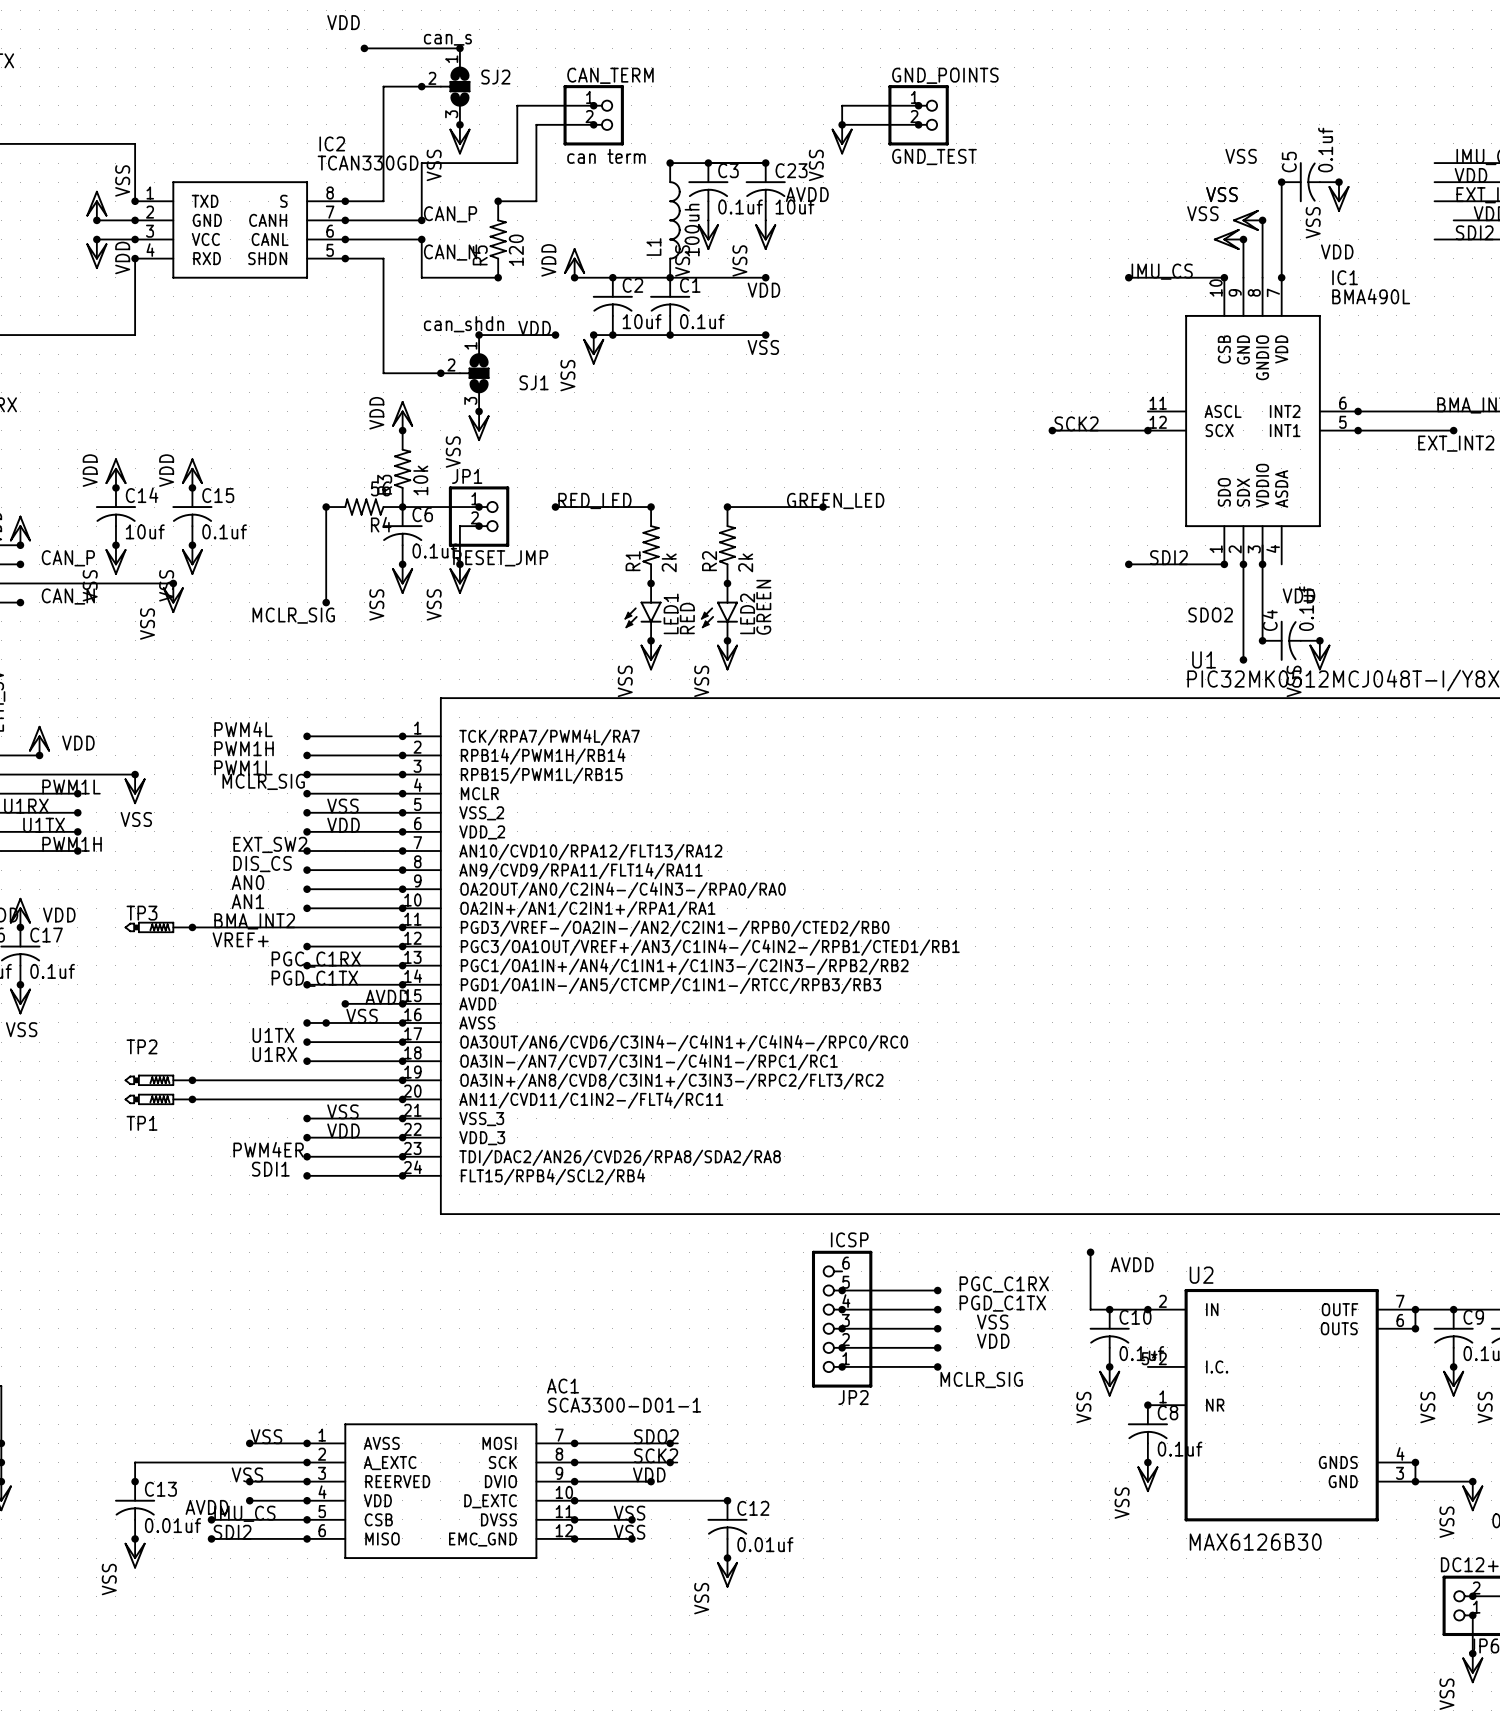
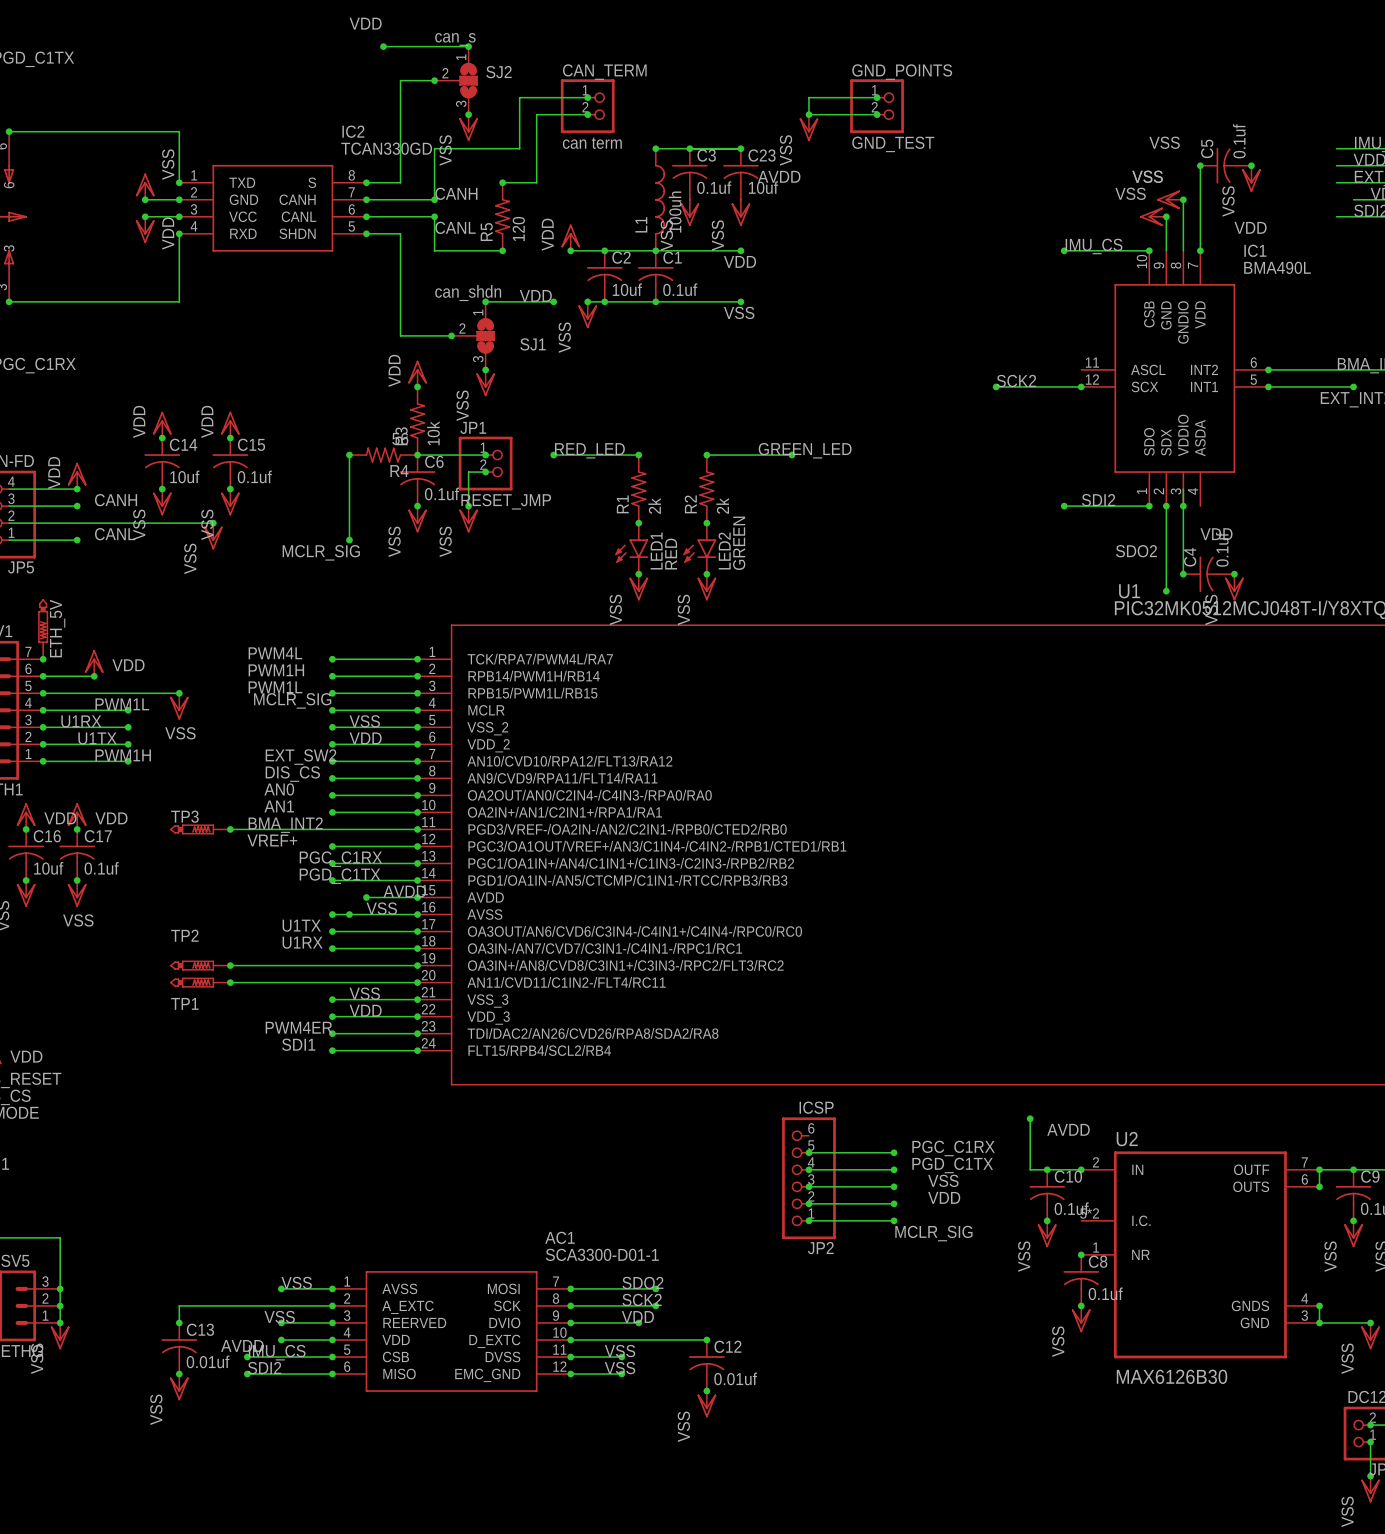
label: CAN_P (450, 214) -> CANH (456, 193)
label: CAN_N (450, 252) -> CANL (455, 227)
label: CAN_P (68, 558) -> CANH (116, 500)
label: CAN_N (68, 596) -> CANL (115, 534)

